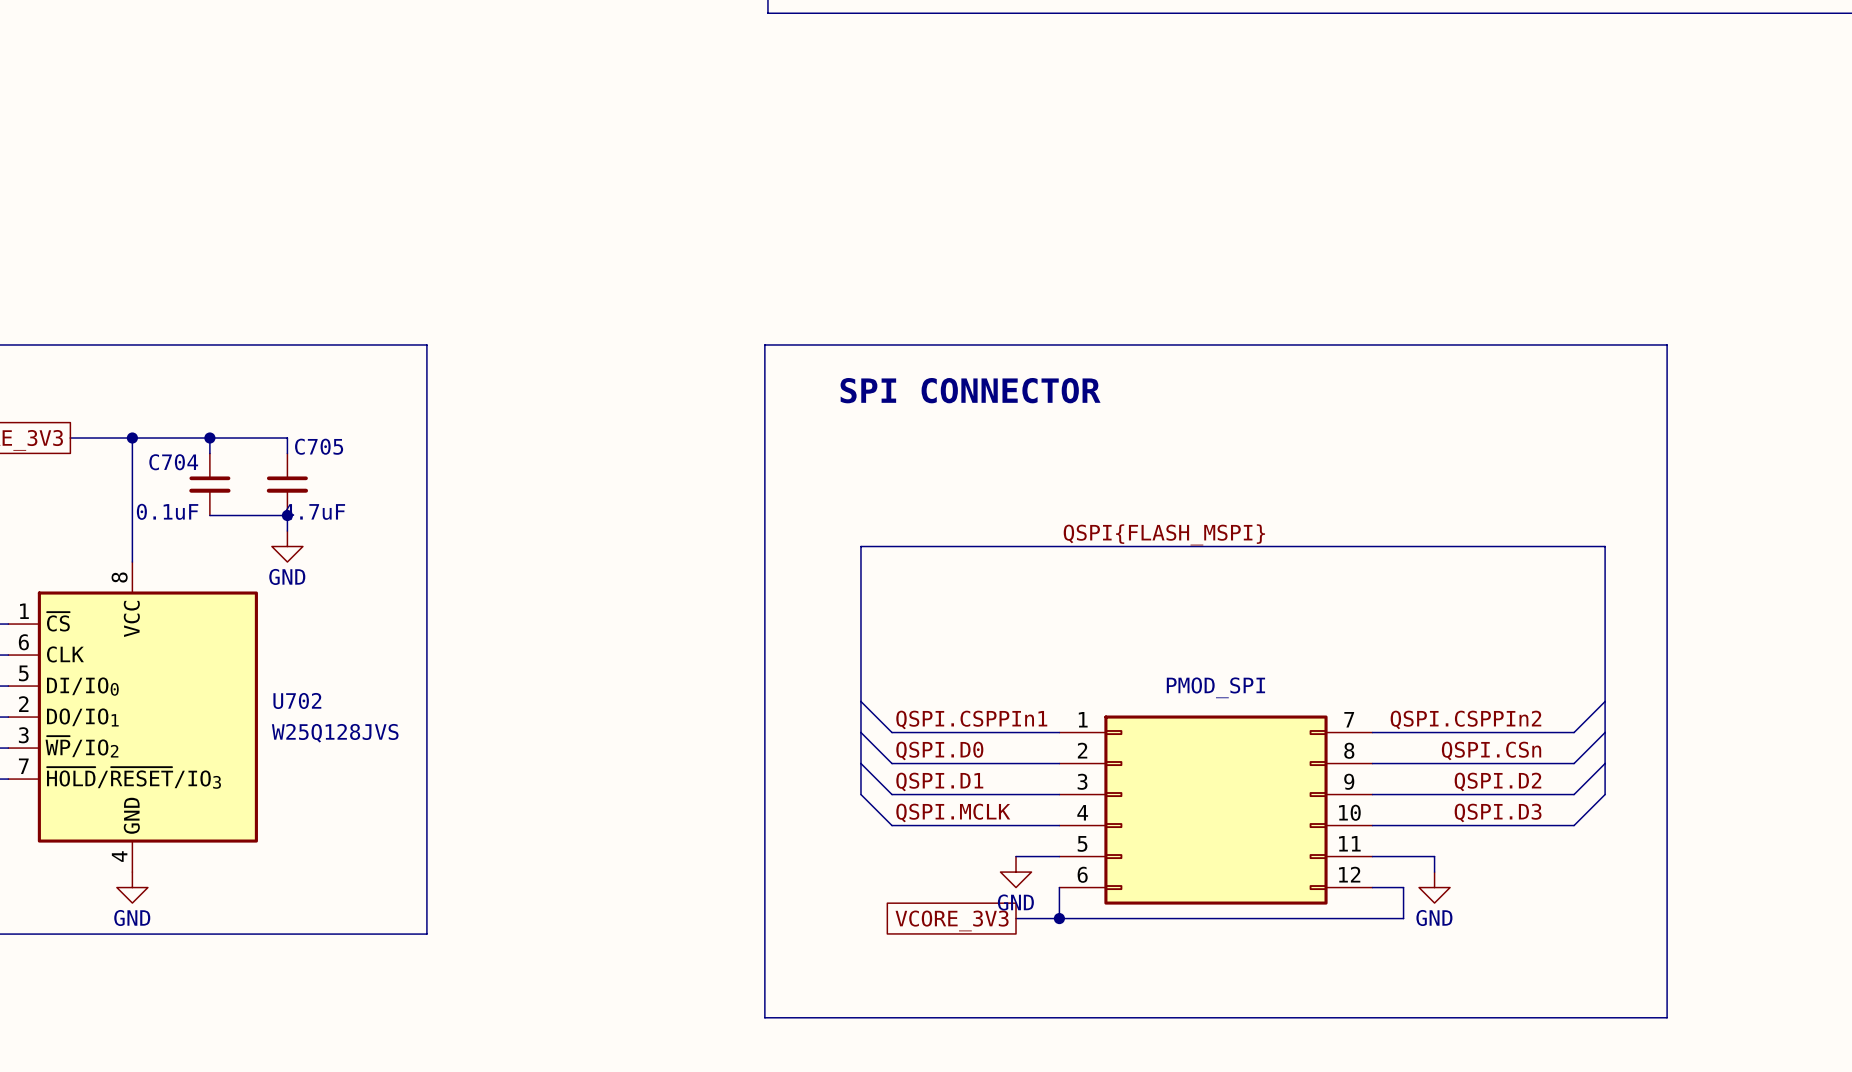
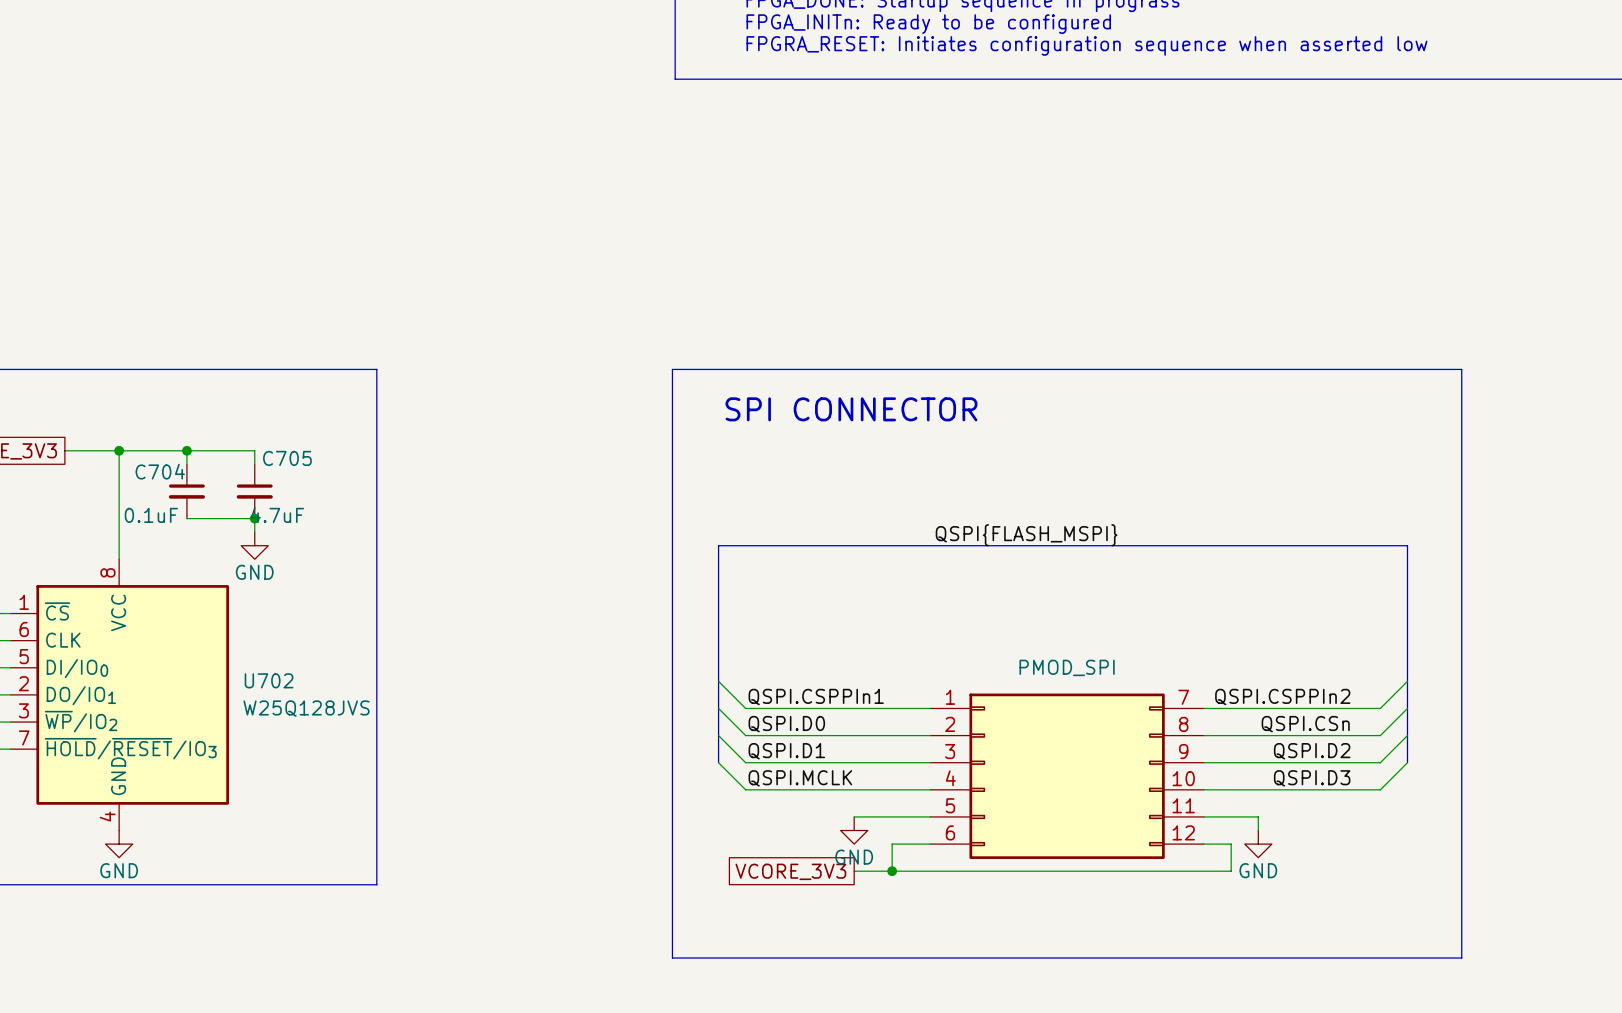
bus: (860, 546) (860, 794) -> (756, 545) (718, 545) (718, 762)
wire: (860, 701) (891, 732) -> (718, 681) (745, 708) (783, 708)
label position: QSPI.CSPPIn1 (971, 719) -> QSPI.CSPPIn1 (816, 697)
wire: (860, 732) (891, 763) -> (718, 708) (745, 735) (783, 735)
label position: QSPI.D0 (939, 750) -> QSPI.D0 (786, 724)
wire: (860, 763) (891, 794) -> (718, 735) (745, 762) (783, 762)
label position: QSPI.D1 (939, 781) -> QSPI.D1 (786, 751)
wire: (860, 794) (891, 825) -> (718, 762) (745, 789) (783, 789)
label position: QSPI.MCLK (953, 812) -> QSPI.MCLK (800, 778)
wire: none -> (854, 816) (892, 816)
power symbol position: GND (1016, 872) -> GND (854, 830)
wire: (1059, 887) (1059, 918) -> (930, 844) (892, 844) (892, 871) (854, 871)
junction position: (1059, 918) -> (892, 871)
global label position: VCORE_3V3 (952, 920) -> VCORE_3V3 (790, 871)

